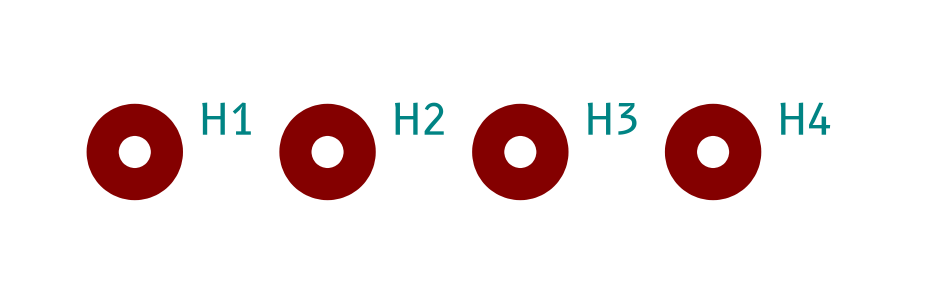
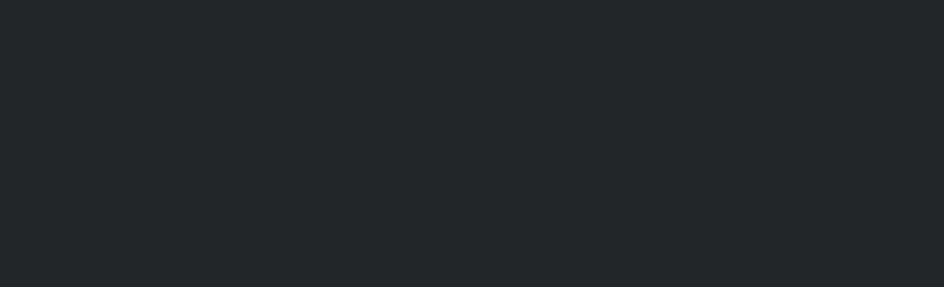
H1: (134, 151) -> none
H2: (327, 151) -> none
H3: (520, 151) -> none
H4: (713, 151) -> none

